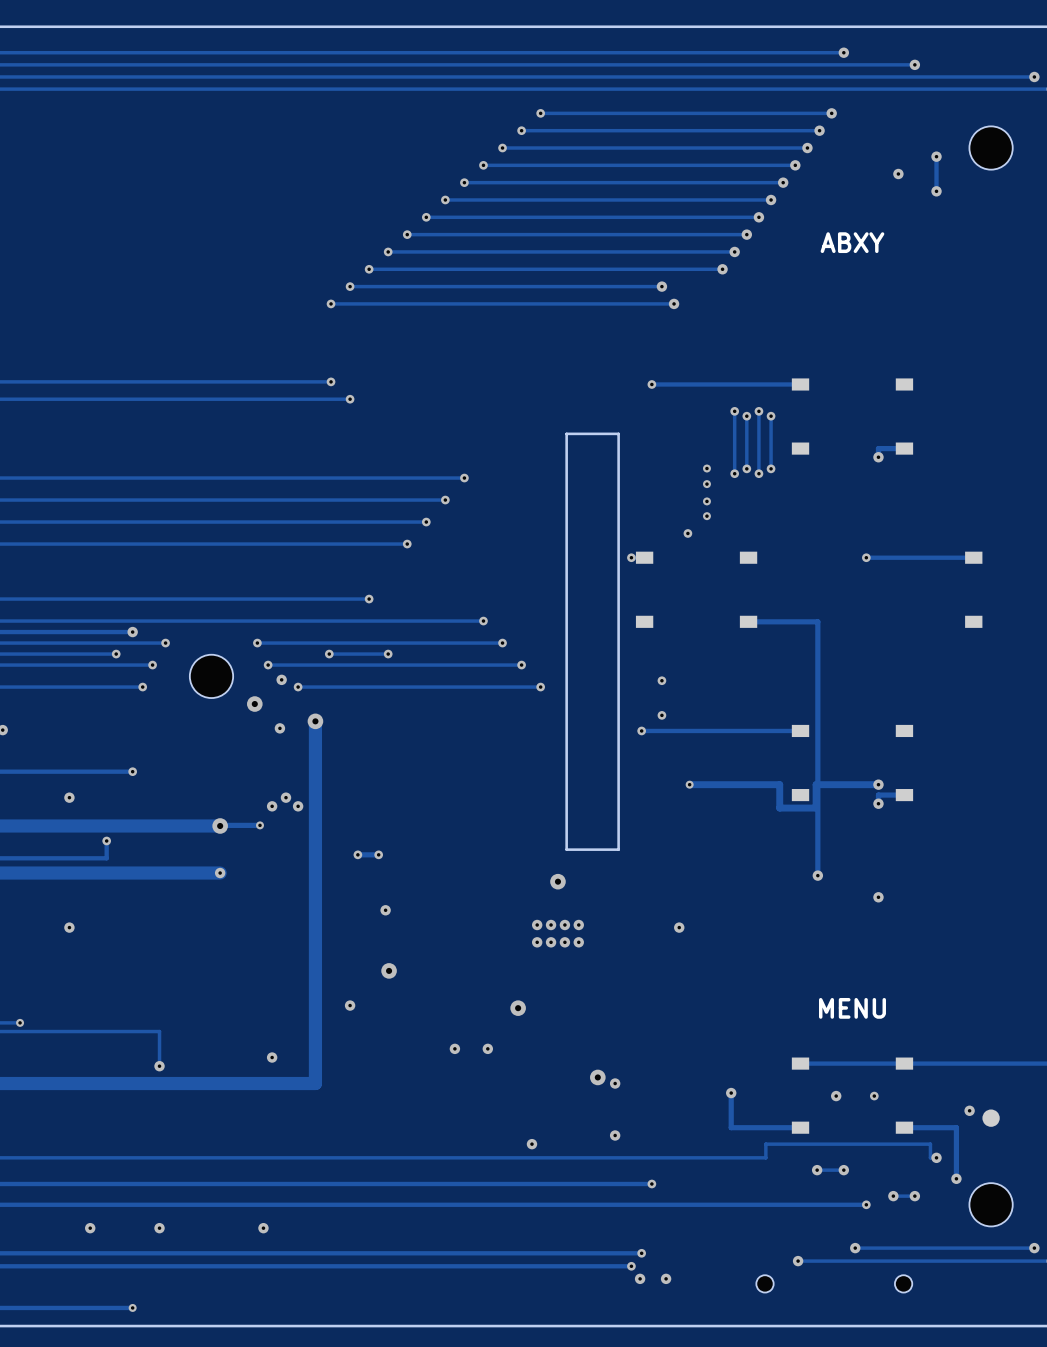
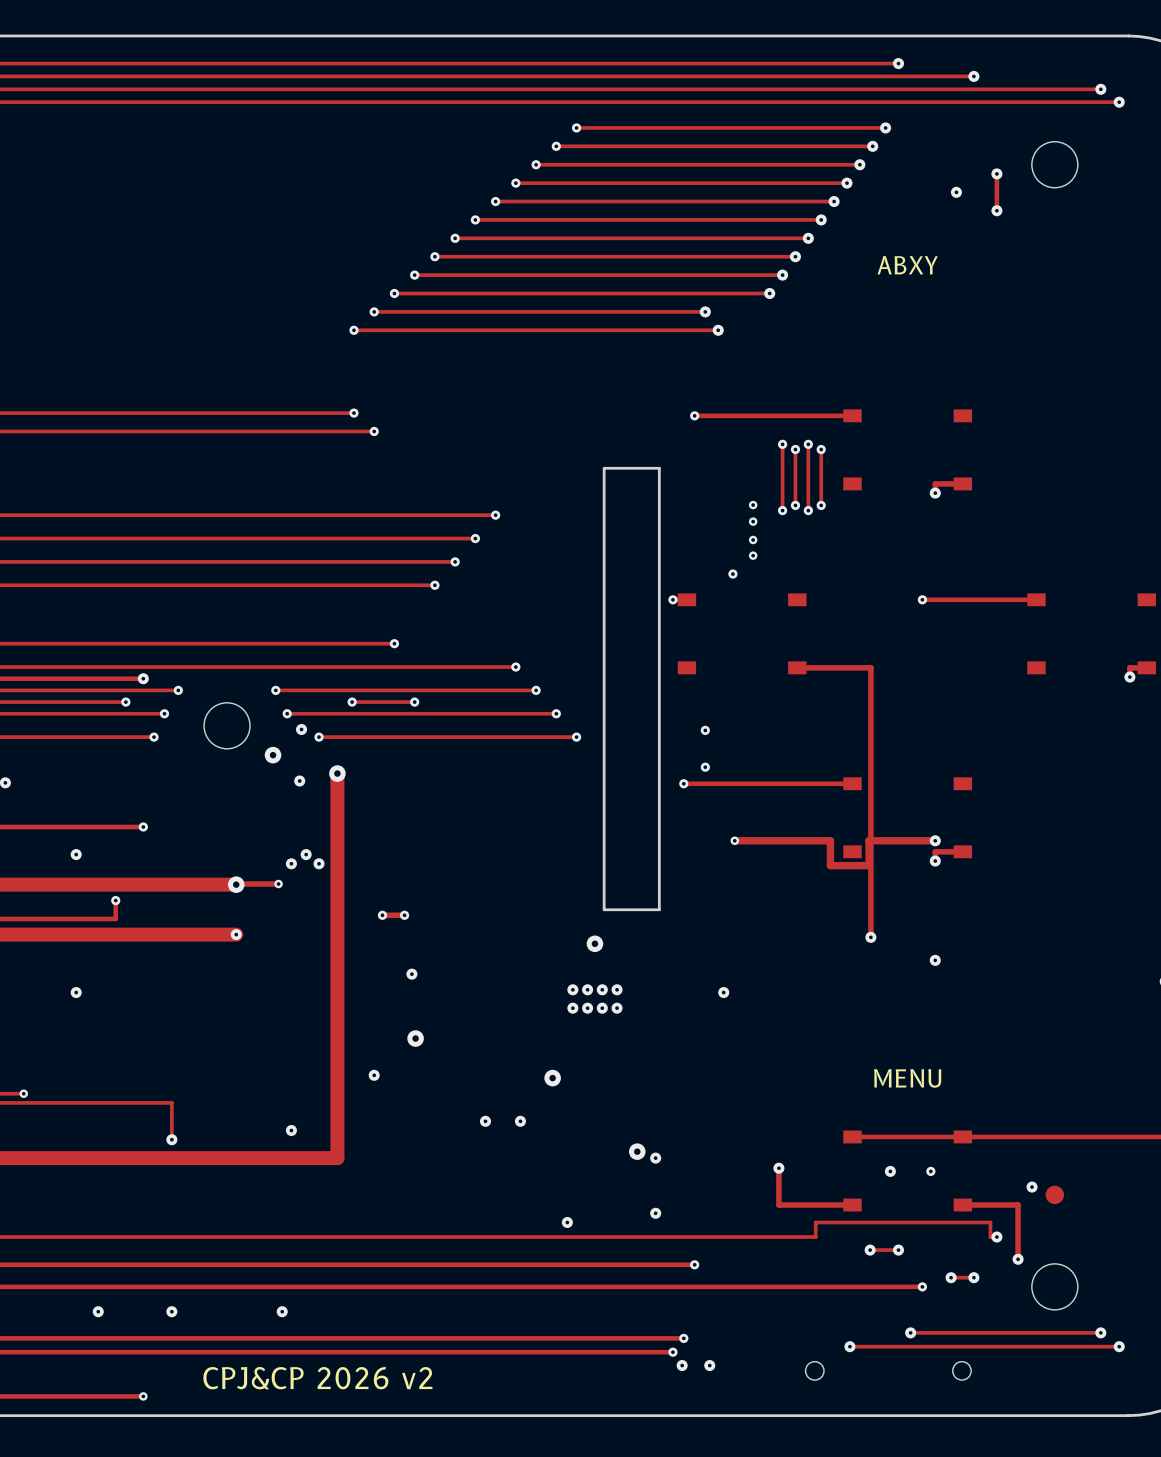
text: none -> CPJ&CP 2026 v2 (317, 1378)

